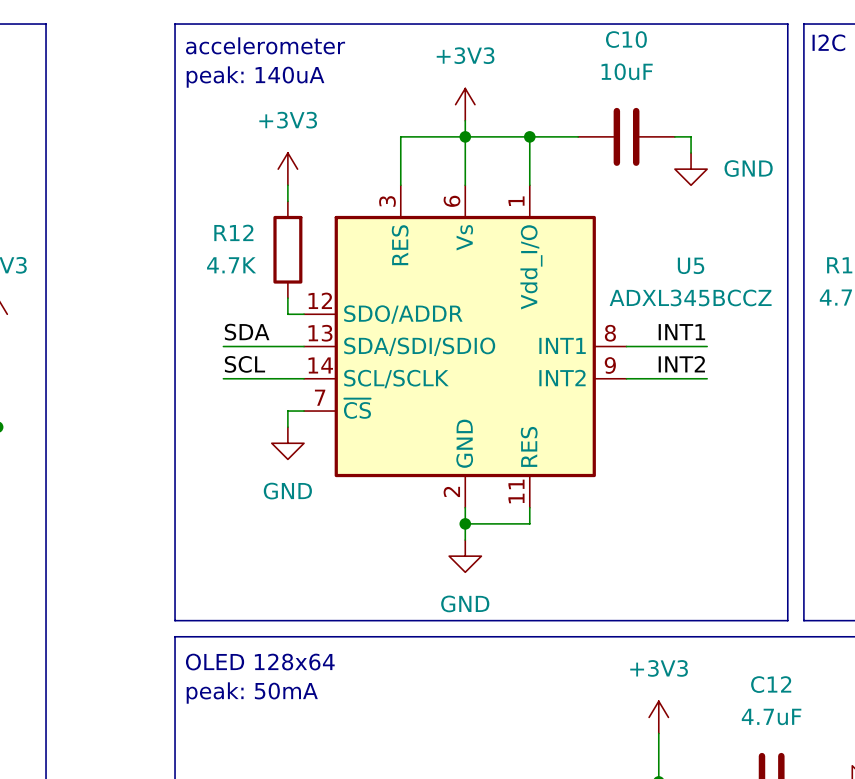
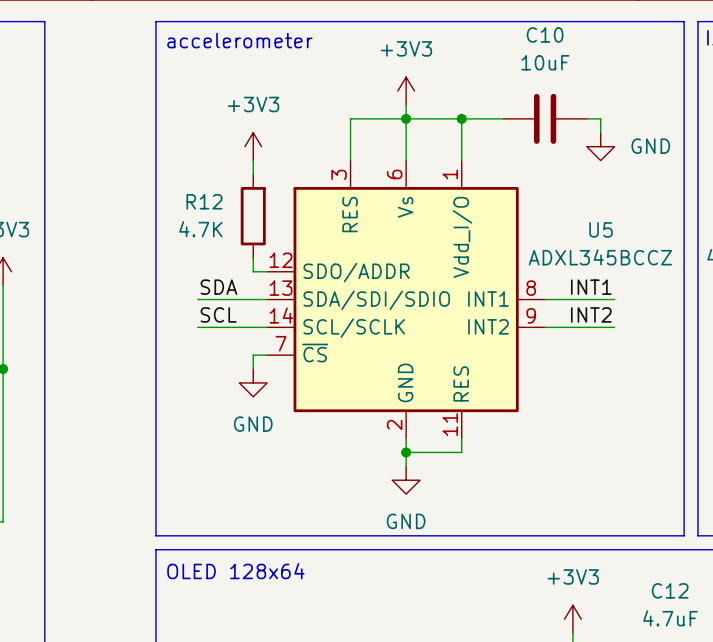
text: peak: 140uA (255, 77) -> none
text: peak: 50mA (252, 693) -> none

